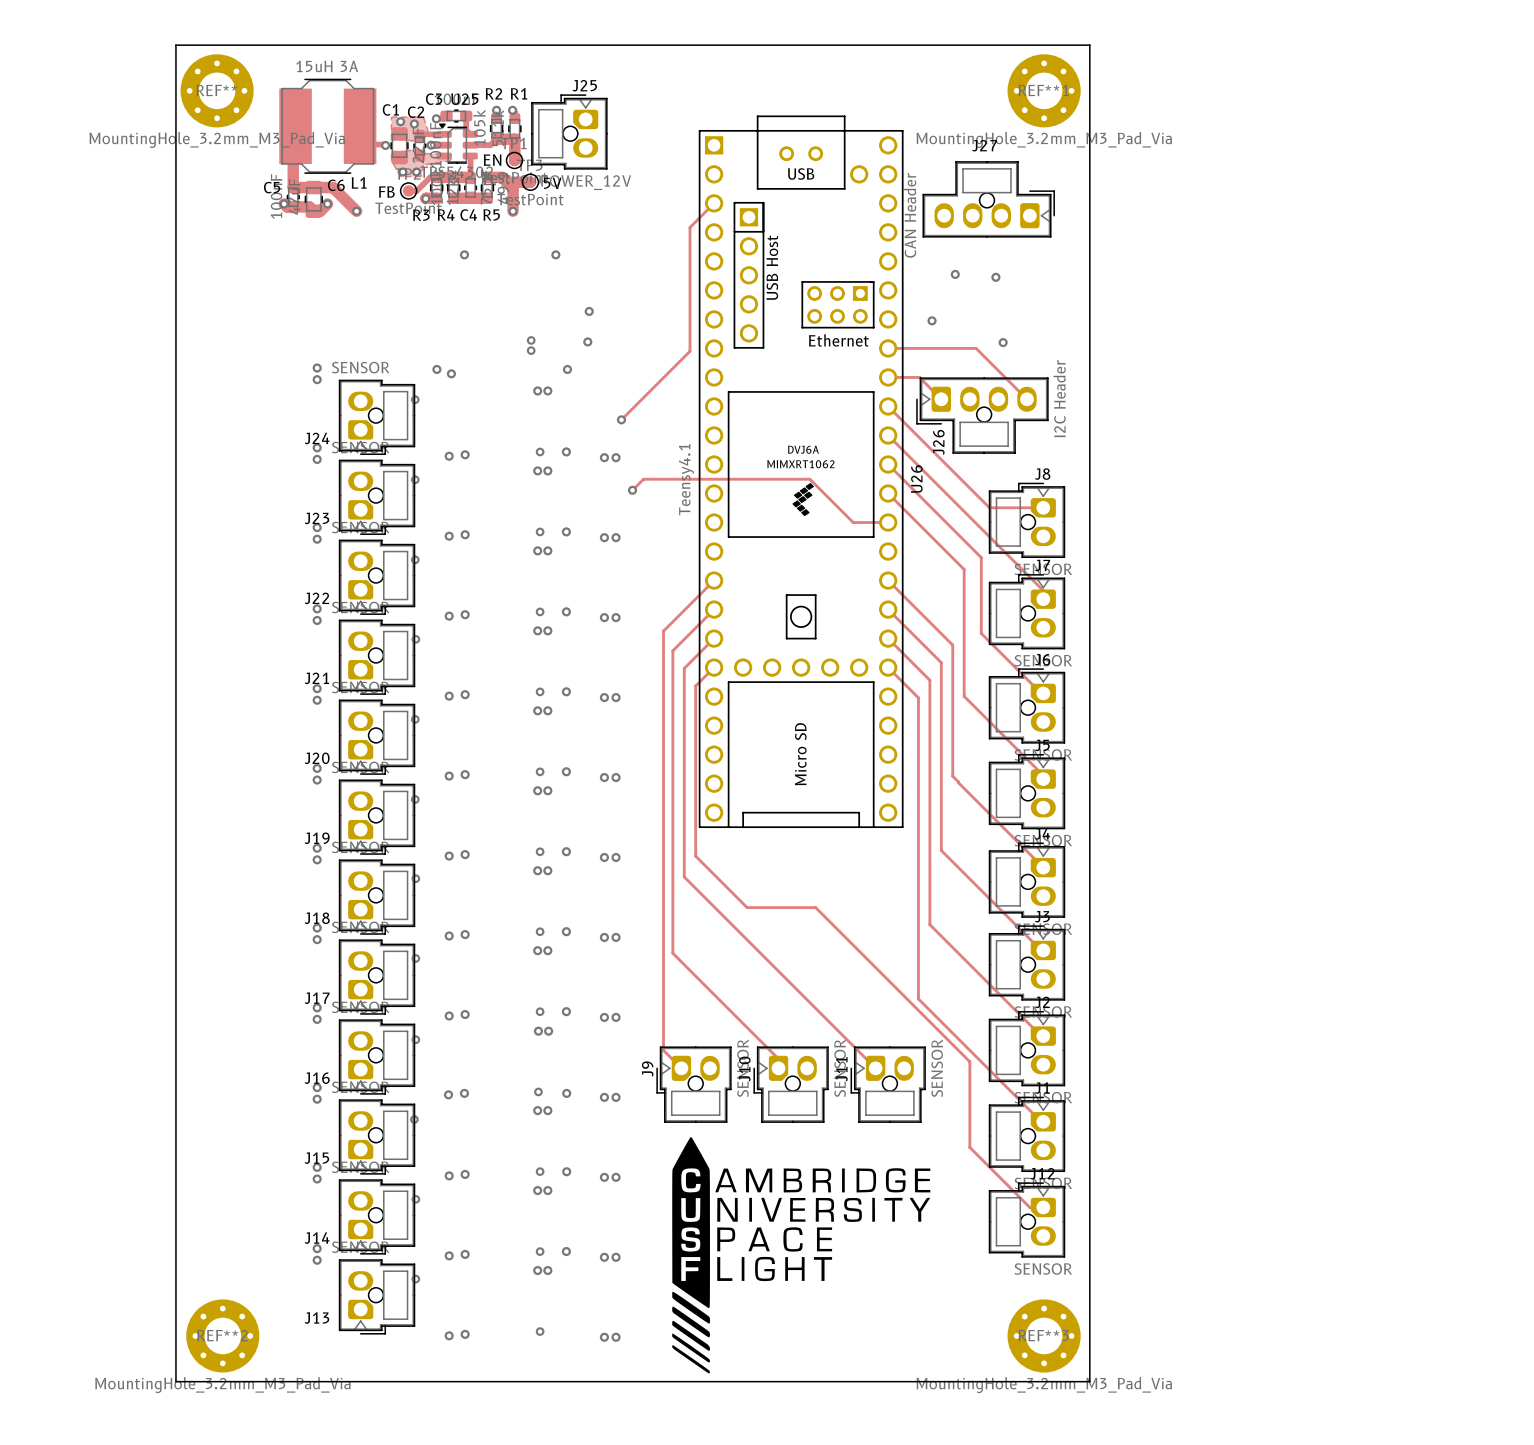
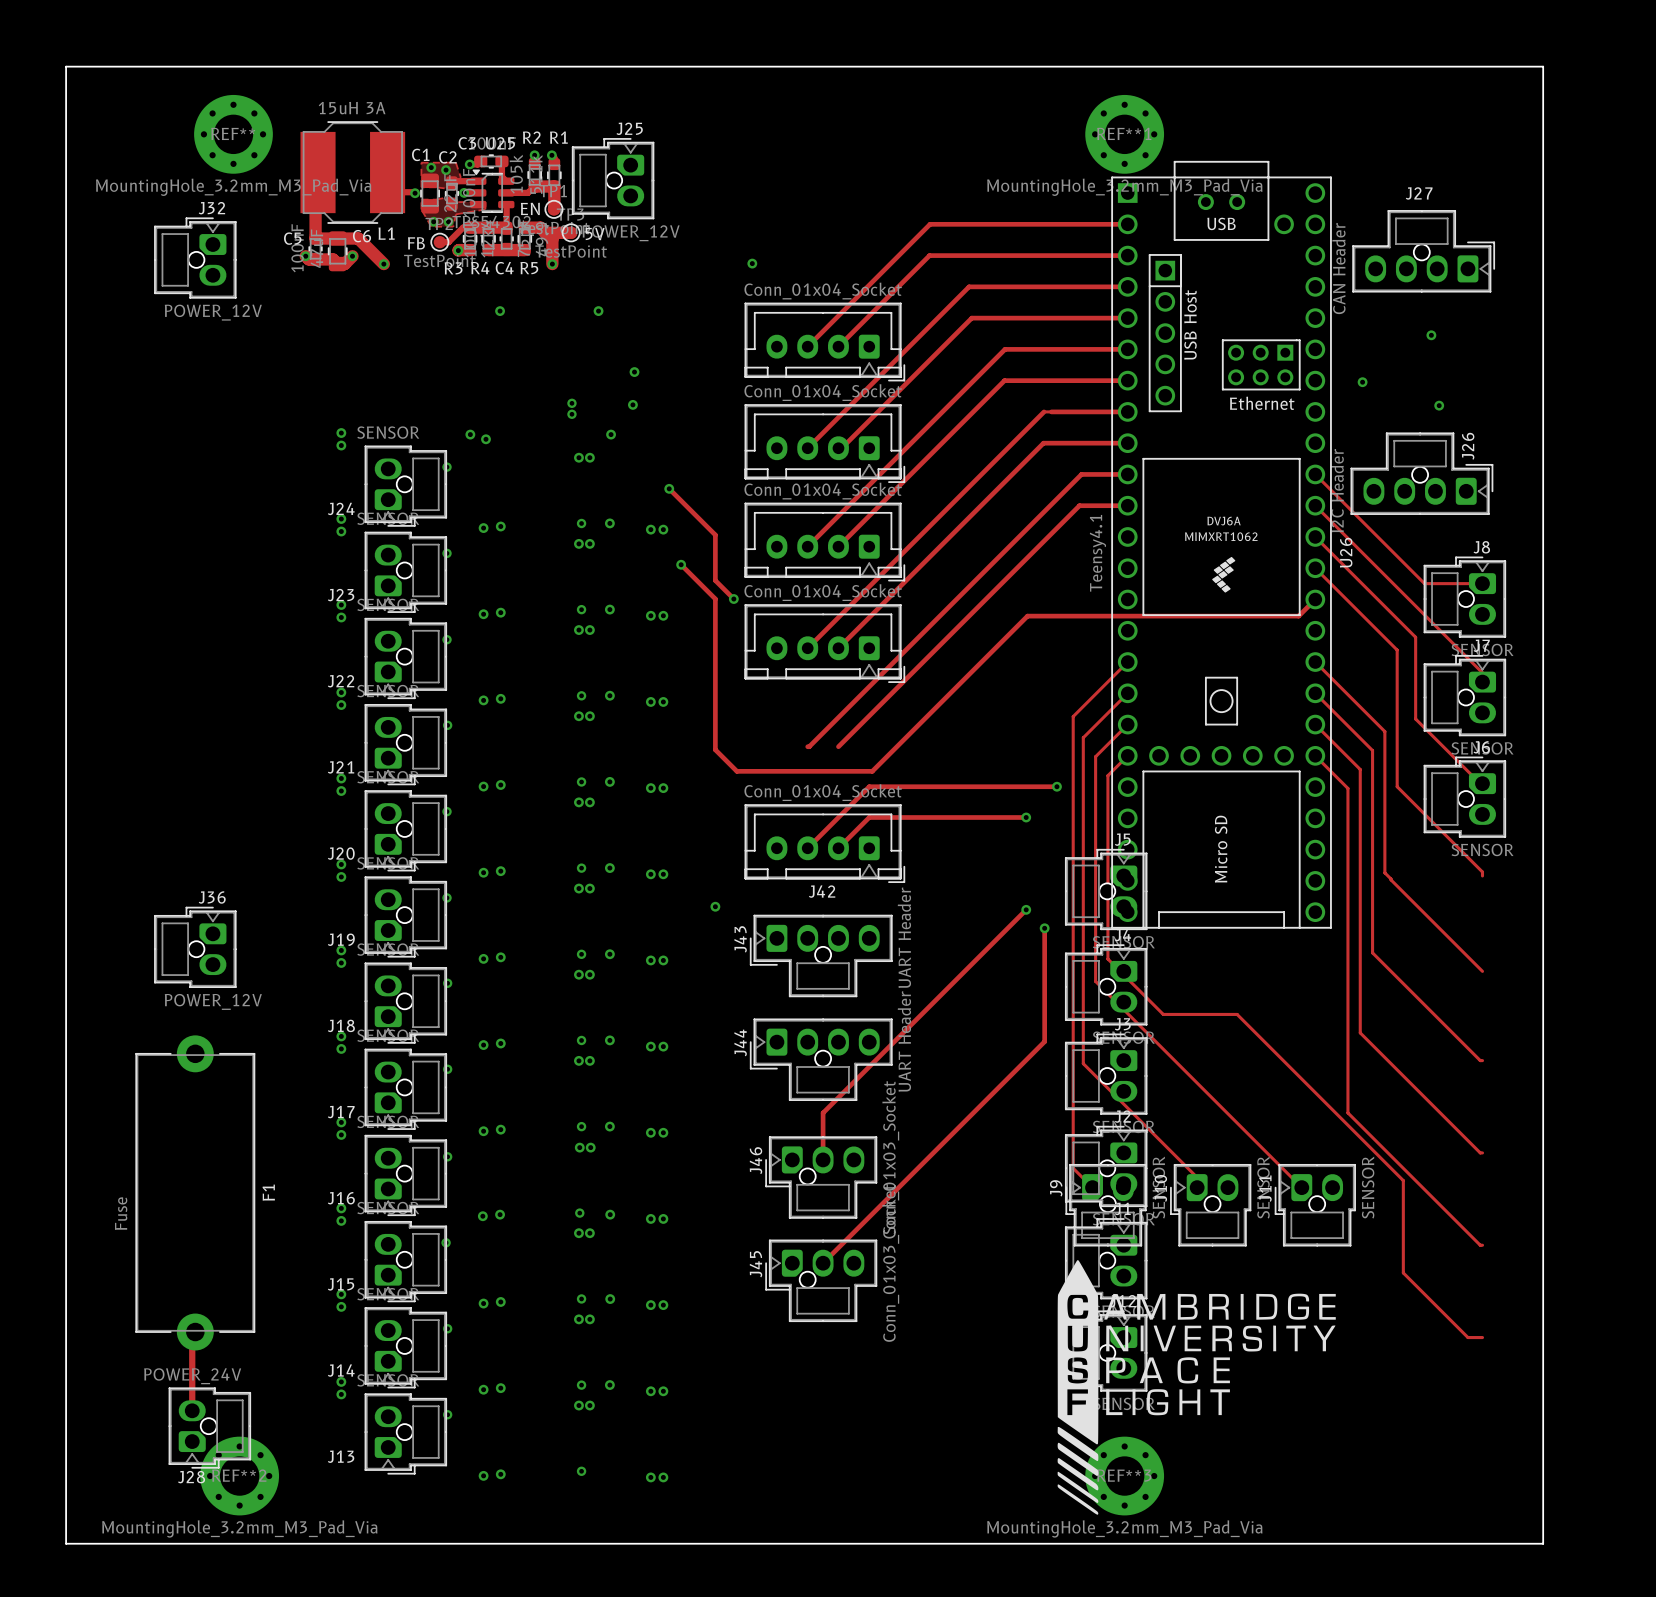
board edge: (175, 45) (1089, 45) (1089, 1381) (175, 1381) (175, 45) -> (66, 66) (66, 1543) (1543, 1543) (1543, 66) (66, 66)
track: none -> (1127, 224) (930, 224) (807, 346)
J27 position: (988, 199) -> (1423, 251)
track: (714, 203) (690, 227) (690, 351) (621, 419) -> (733, 599) (715, 580) (715, 535) (669, 488)
track: none -> (1127, 255) (929, 255) (838, 346)
J32: none -> POWER_12V (195, 258)
via: none -> (752, 263)
track: none -> (1127, 286) (969, 286) (807, 448)
track: none -> (1127, 318) (971, 318) (841, 448) (838, 448)
via: (955, 274) -> none
via: (995, 277) -> none
via: none -> (1431, 335)
part: none -> Conn_01x04_Socket (824, 342)
track: none -> (1127, 349) (1005, 349) (807, 546)
track: none -> (1127, 380) (1004, 380) (838, 546)
via: (932, 320) -> none
via: none -> (1362, 382)
via: (1003, 342) -> none
via: none -> (1439, 405)
track: (888, 348) (969, 348) -> (807, 648) (1044, 411)
track: (976, 348) (1026, 399) -> (1051, 411) (1127, 411)
part: none -> Conn_01x04_Socket (824, 443)
track: (888, 377) (919, 377) (941, 399) -> none
track: none -> (1127, 443) (1043, 443) (838, 648)
track: (888, 406) (989, 507) (1043, 507) -> none
track: none -> (1127, 474) (1081, 474) (807, 746)
track: none -> (1315, 474) (1424, 583) (1482, 583)
J26 rotation: 0° (982, 415) -> 180° (1421, 473)
J26 position: (982, 415) -> (1421, 473)
track: (888, 435) (1043, 590) (1043, 599) -> none
track: none -> (1127, 505) (1079, 505) (838, 746)
track: none -> (1315, 505) (1482, 672) (1482, 682)
track: (888, 464) (981, 557) (981, 633) (1043, 693) -> none
track: none -> (1315, 536) (1415, 637) (1415, 719) (1480, 783) (1482, 783)
part: none -> Conn_01x04_Socket (824, 542)
U26 position: (801, 471) -> (1221, 544)
track: (632, 490) (643, 479) (809, 479) (853, 522) (888, 522) -> (681, 564) (715, 599) (715, 749) (736, 771) (872, 771) (1027, 616) (1298, 616) (1315, 599)
track: (888, 493) (964, 569) (964, 696) (1043, 775) (1043, 779) -> none
track: none -> (1315, 568) (1397, 650) (1397, 786) (1482, 872) (1482, 875)
J8 position: (1026, 520) -> (1464, 597)
via: none -> (733, 599)
part: none -> Conn_01x04_Socket (824, 643)
track: (714, 580) (663, 631) (663, 1050) (681, 1068) -> none
track: (888, 580) (952, 645) (952, 776) (1043, 867) -> none
track: none -> (1127, 662) (1073, 716) (1073, 1168) (1092, 1187)
track: none -> (1315, 662) (1384, 731) (1384, 872) (1482, 971)
track: (714, 609) (672, 650) (672, 953) (778, 1058) (778, 1068) -> none
track: (888, 609) (941, 662) (941, 850) (1043, 950) -> none
track: none -> (1127, 693) (1083, 737) (1083, 1063) (1197, 1177) (1197, 1187)
track: none -> (1315, 693) (1372, 750) (1372, 952) (1480, 1060) (1482, 1060)
J7 position: (1026, 611) -> (1464, 695)
track: (714, 638) (684, 668) (684, 876) (875, 1068) -> none
track: (888, 638) (929, 680) (929, 924) (1043, 1036) -> none
track: none -> (1127, 724) (1095, 756) (1095, 981) (1301, 1187)
track: none -> (1315, 724) (1360, 769) (1360, 1032) (1480, 1152) (1482, 1152)
track: (714, 667) (695, 685) (695, 856) (747, 907) (815, 907) (969, 1061) (969, 1147) (1029, 1207) (1043, 1207) -> none
track: (888, 667) (918, 697) (918, 998) (1043, 1121) -> none
track: none -> (1127, 755) (1107, 775) (1107, 959) (1163, 1014) (1237, 1014) (1403, 1180) (1403, 1272) (1467, 1337) (1482, 1337)
track: none -> (1315, 755) (1347, 788) (1347, 1112) (1480, 1245) (1482, 1245)
track: none -> (1056, 786) (869, 786) (807, 848)
via: none -> (1056, 786)
J6 position: (1026, 705) -> (1464, 797)
track: none -> (1026, 817) (869, 817) (838, 848)
via: none -> (1026, 817)
J42: none -> Conn_01x04_Socket (824, 843)
via: none -> (715, 906)
track: none -> (1026, 909) (823, 1112) (823, 1159)
via: none -> (1026, 909)
track: none -> (1044, 928) (1044, 1041) (823, 1263)
via: none -> (1044, 928)
J36: none -> POWER_12V (195, 947)
J43: none -> UART Header (821, 955)
J44: none -> UART Header (821, 1059)
J46: none -> Conn_01x03_Socket (821, 1177)
F1: none -> Fuse (195, 1192)
J9 position: (694, 1084) -> (1106, 1205)
J10 position: (791, 1084) -> (1210, 1205)
J11 position: (888, 1084) -> (1315, 1205)
drawing: none -> [1057, 1260, 1336, 1515]
drawing: [672, 1137, 931, 1374] -> none
J45: none -> Conn_01x03_Socket (821, 1280)
track: none -> (195, 1332) (192, 1335) (192, 1410)
J28: none -> POWER_24V (209, 1428)

